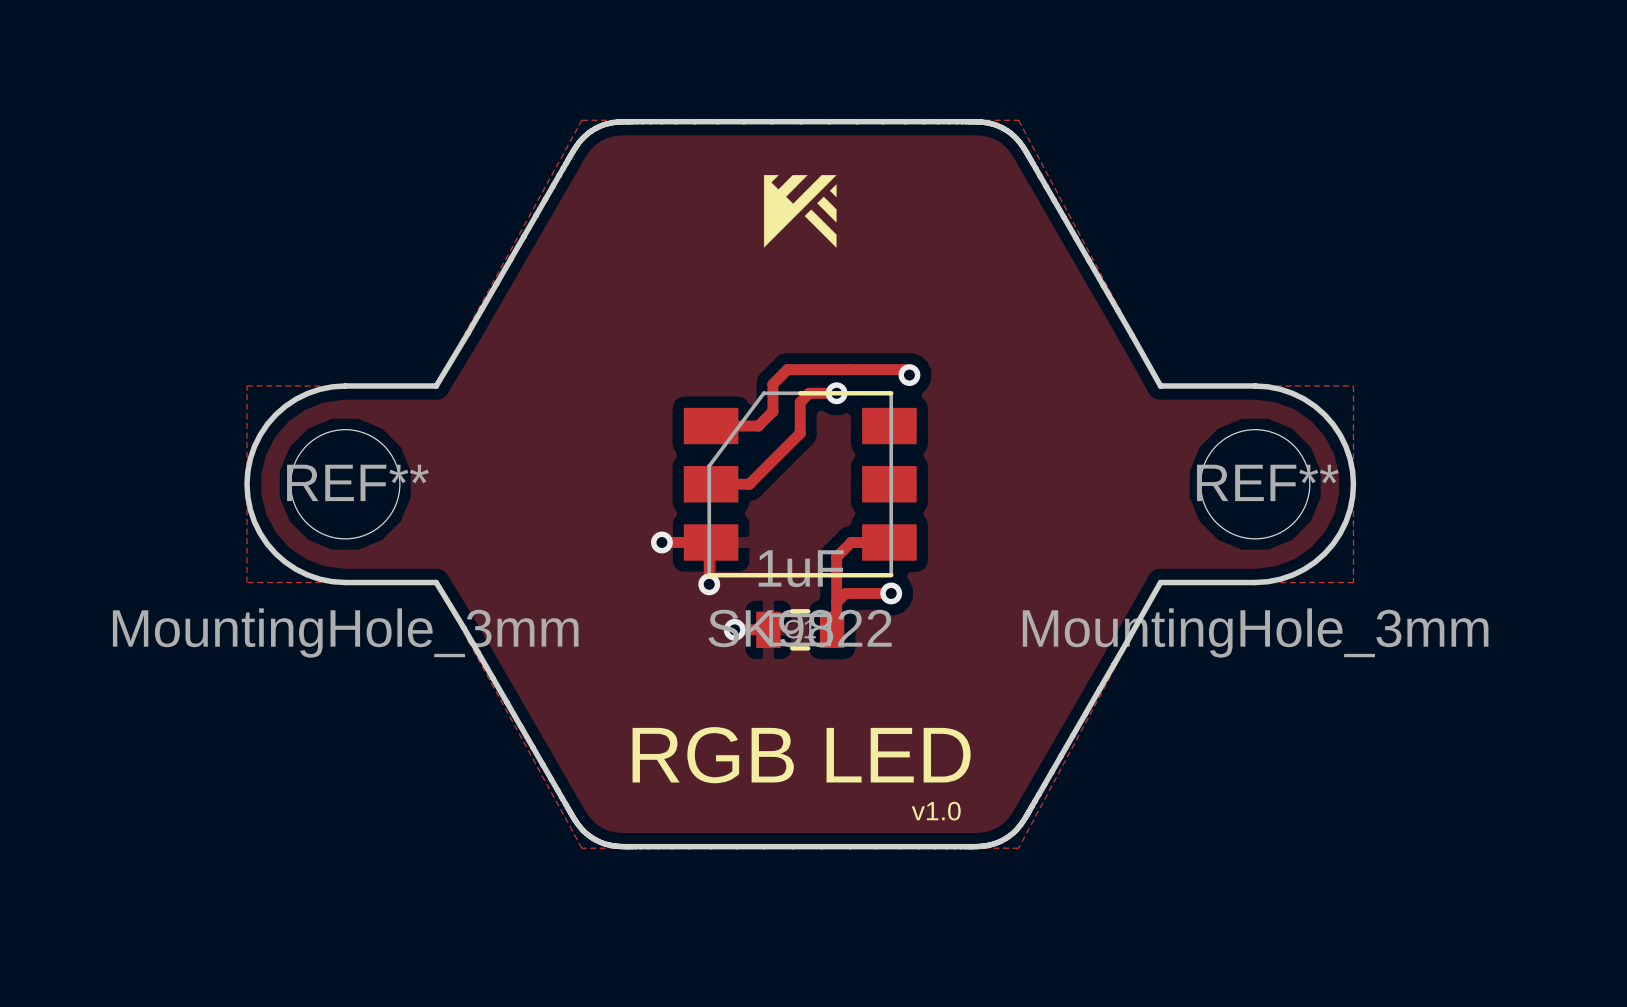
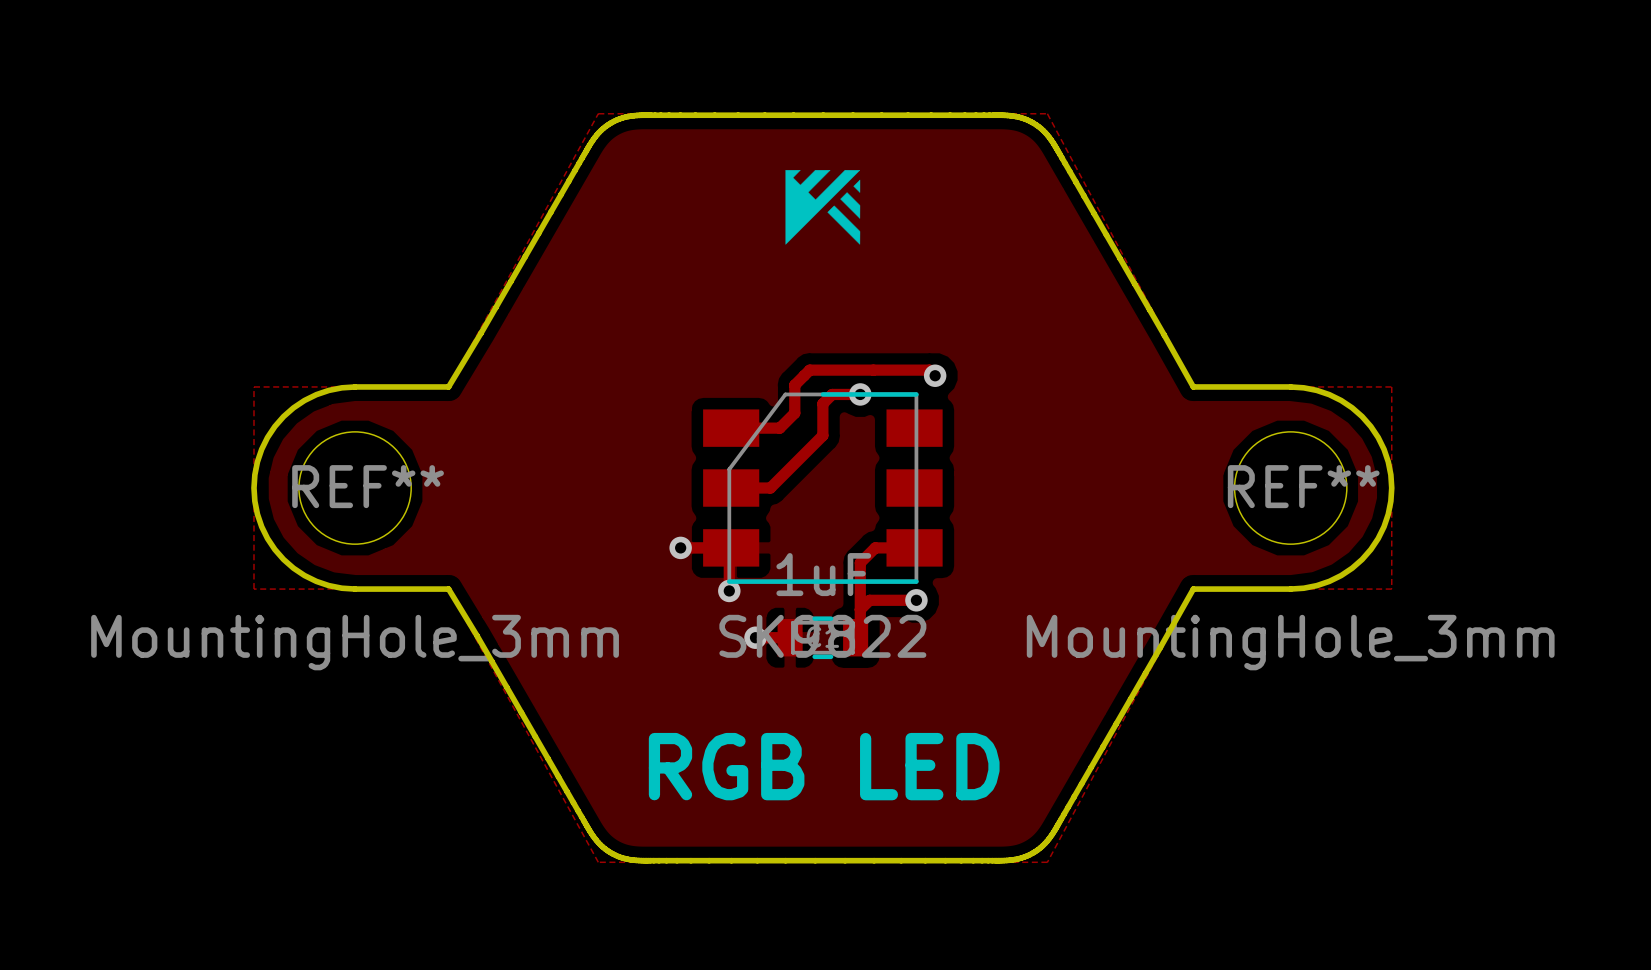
text: v1.0 (936, 811) -> none

